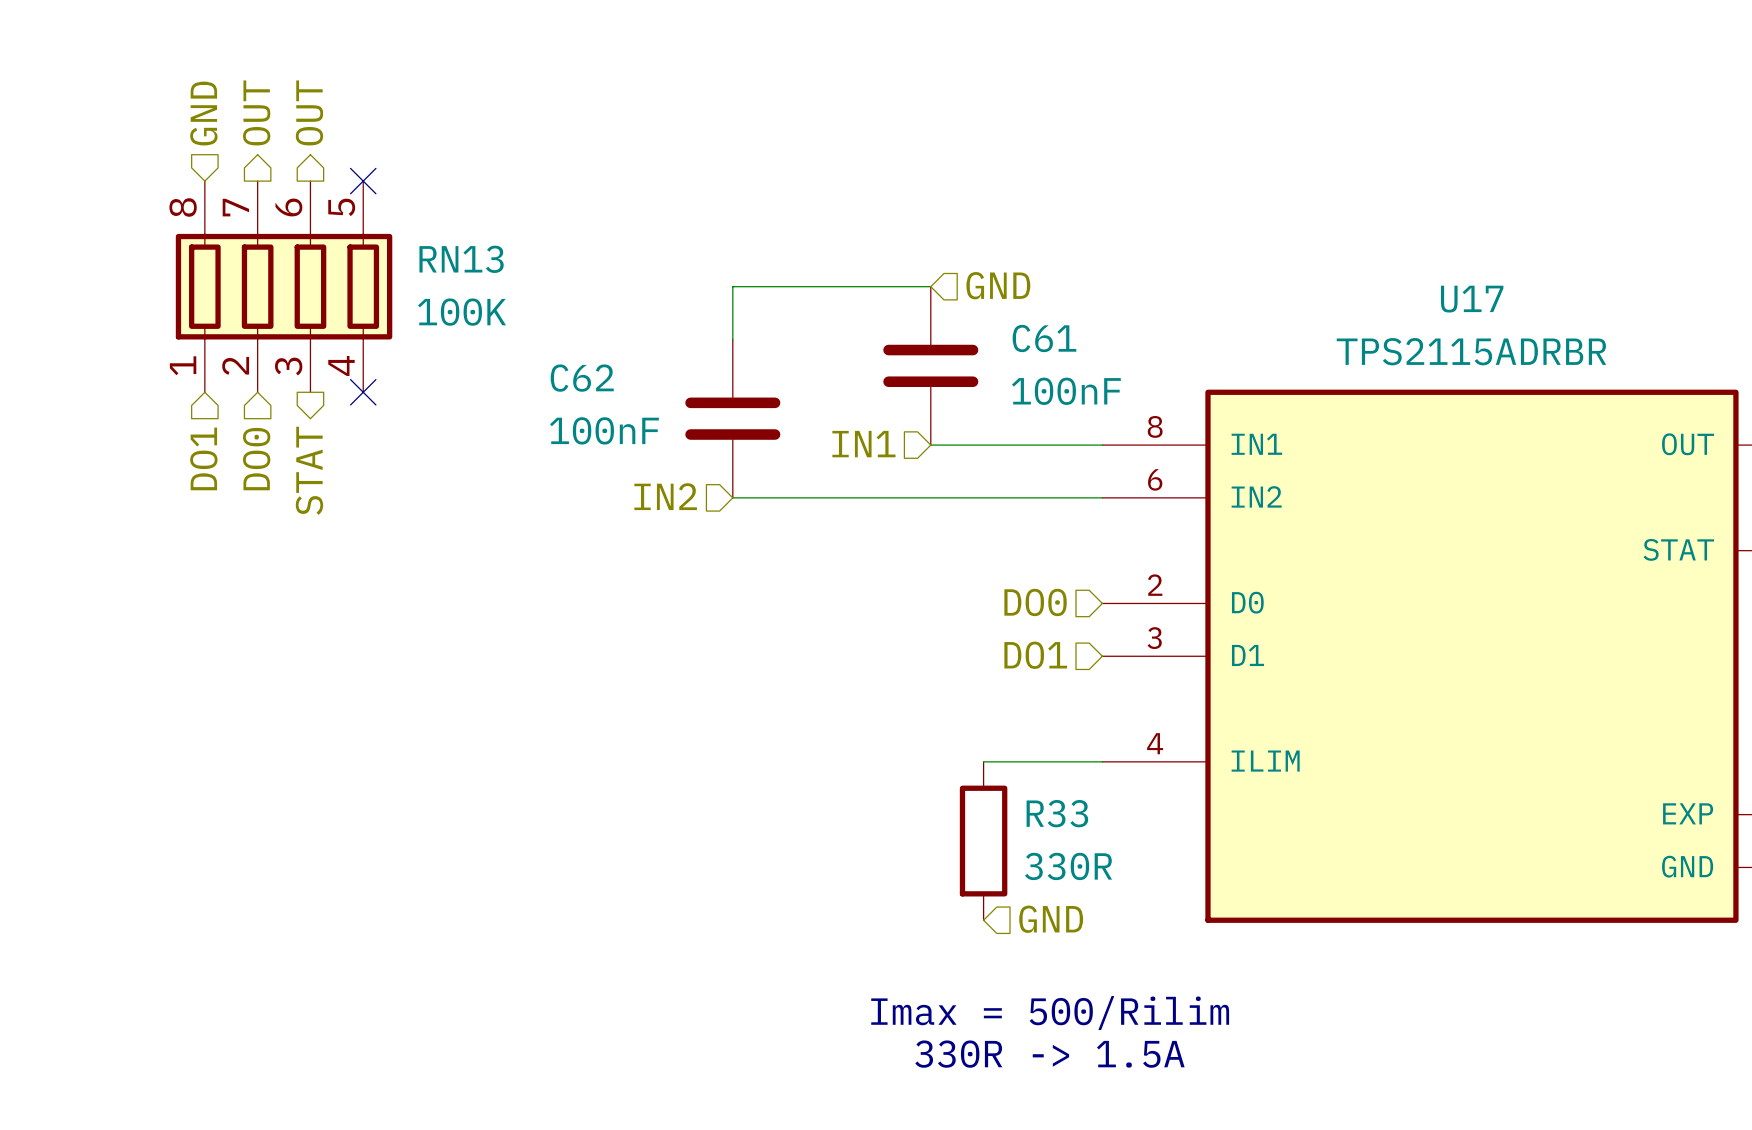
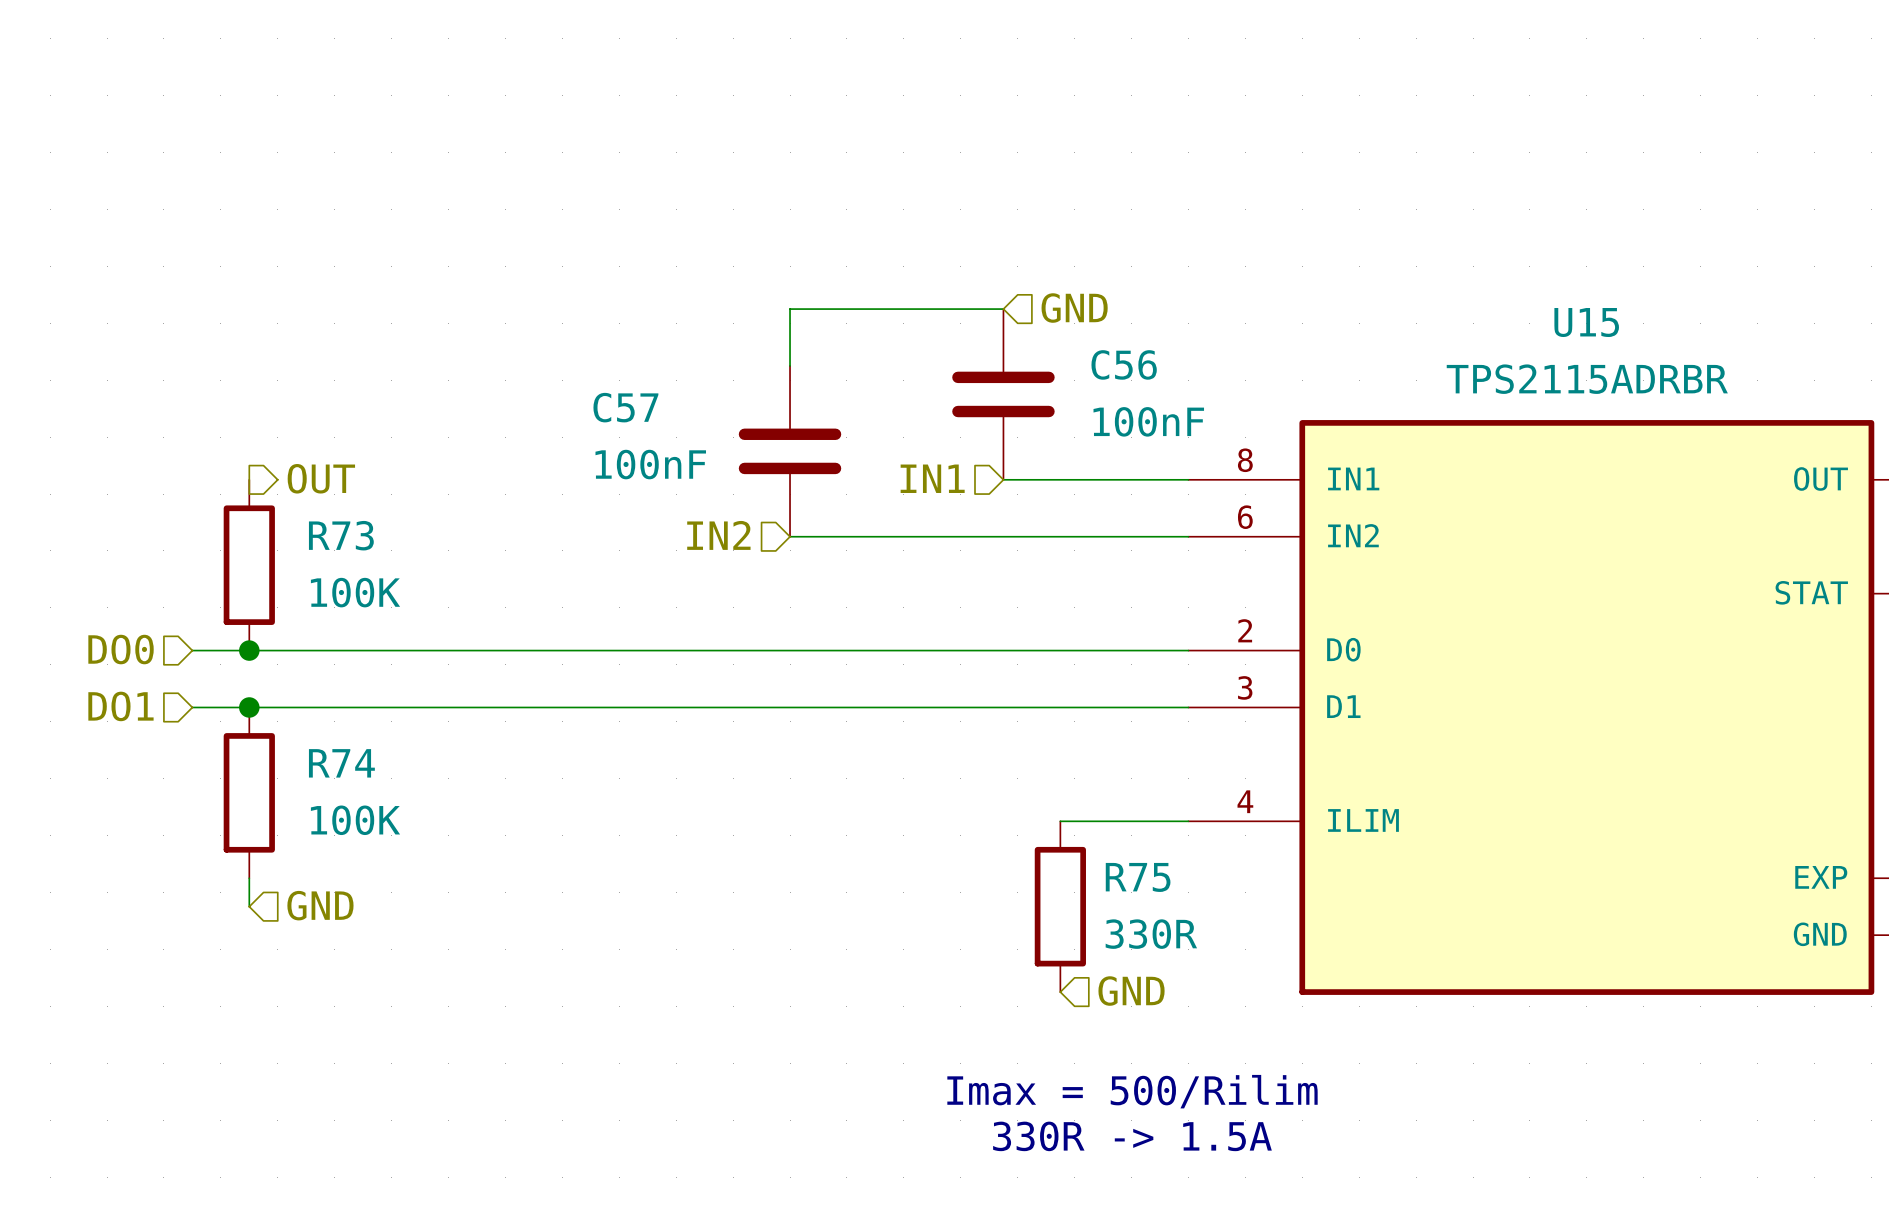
hierarchical label: OUT (256, 112) -> none
hierarchical label: OUT (309, 112) -> none
hierarchical label: GND (203, 113) -> none
no-connect mark: (363, 181) -> none
RN13: 100K (284, 286) -> none
U17 name: U17 (1472, 299) -> U15 (1586, 322)
C61 name: C61 (1044, 338) -> C56 (1124, 364)
C62 name: C62 (582, 378) -> C57 (625, 407)
no-connect mark: (363, 392) -> none
hierarchical label: none -> OUT (321, 478)
hierarchical label rotation: 0° (203, 458) -> 90° clockwise (120, 706)
hierarchical label position: DO1 (203, 458) -> DO1 (120, 706)
hierarchical label rotation: 0° (256, 459) -> 90° clockwise (121, 649)
hierarchical label position: DO0 (256, 459) -> DO0 (121, 649)
hierarchical label: STAT (309, 470) -> none
R73: none -> 100K (249, 565)
hierarchical label: DO0 (1035, 602) -> none
wire: none -> (192, 650) (1188, 650)
junction: none -> (249, 650)
hierarchical label: DO1 (1035, 655) -> none
wire: none -> (192, 707) (1188, 707)
junction: none -> (249, 707)
R74: none -> 100K (249, 792)
R33 name: R33 (1057, 813) -> R75 (1138, 877)
wire: none -> (249, 878) (249, 906)
hierarchical label: none -> GND (320, 905)

